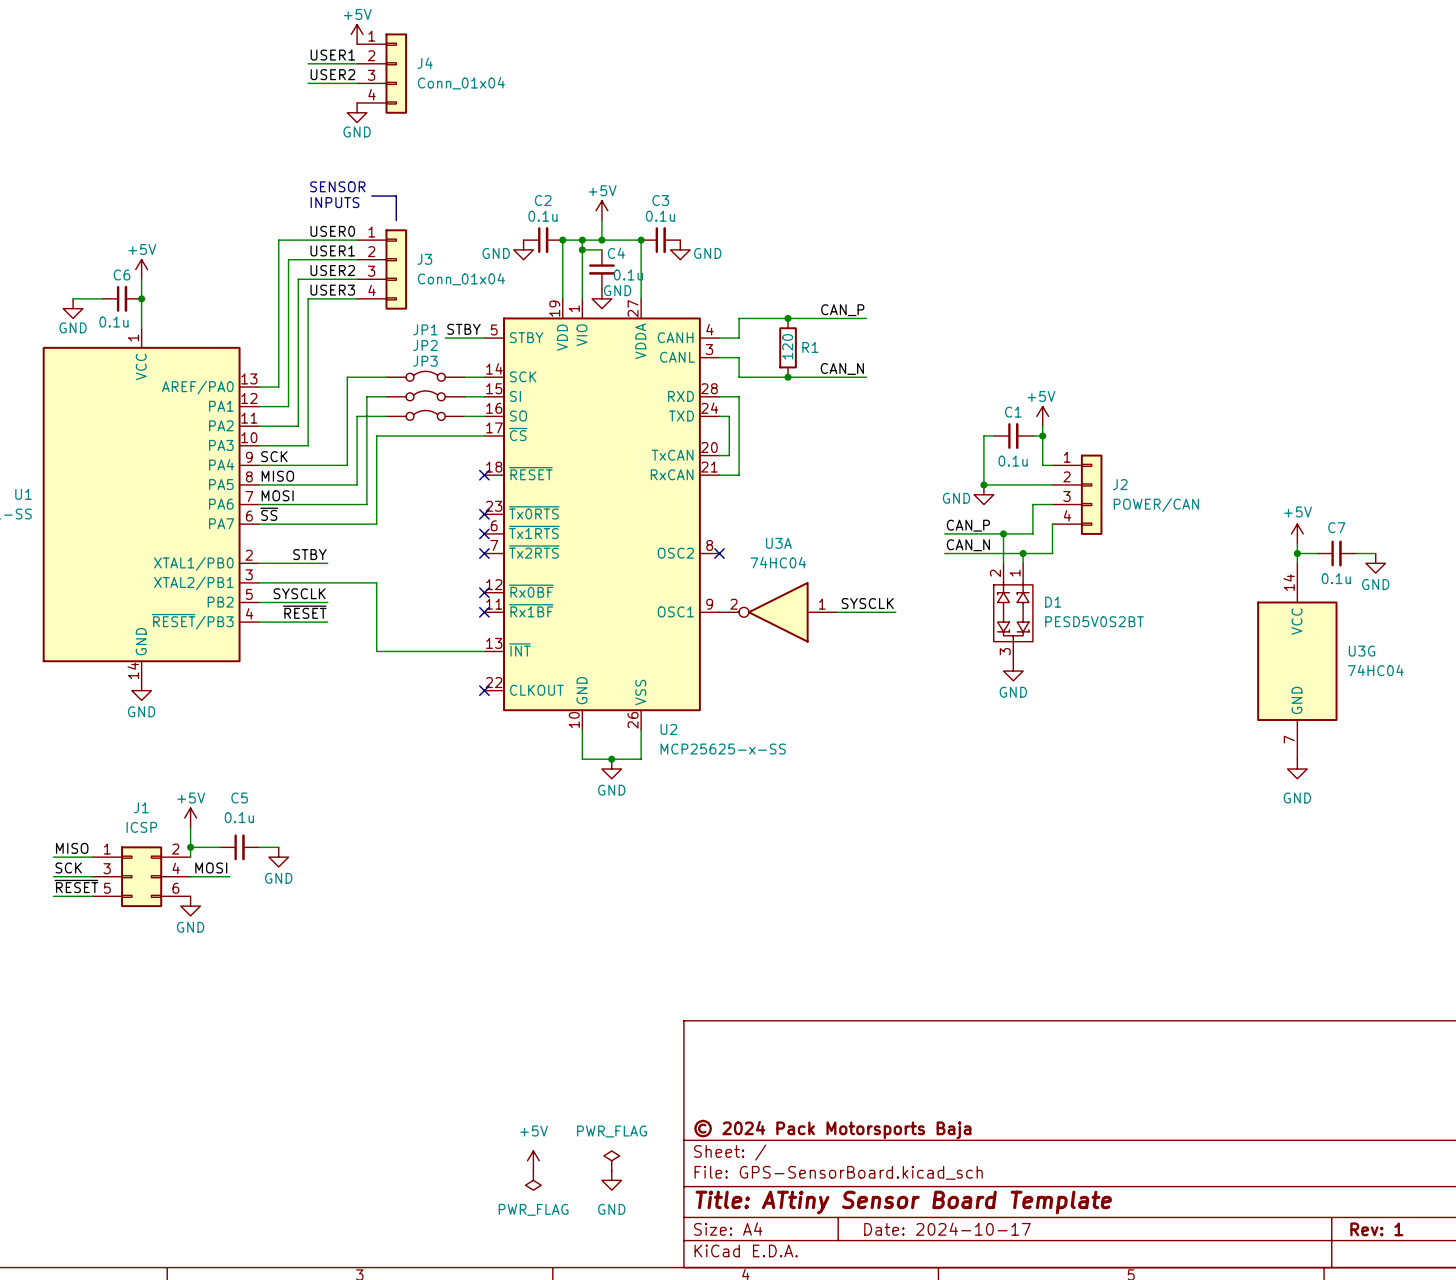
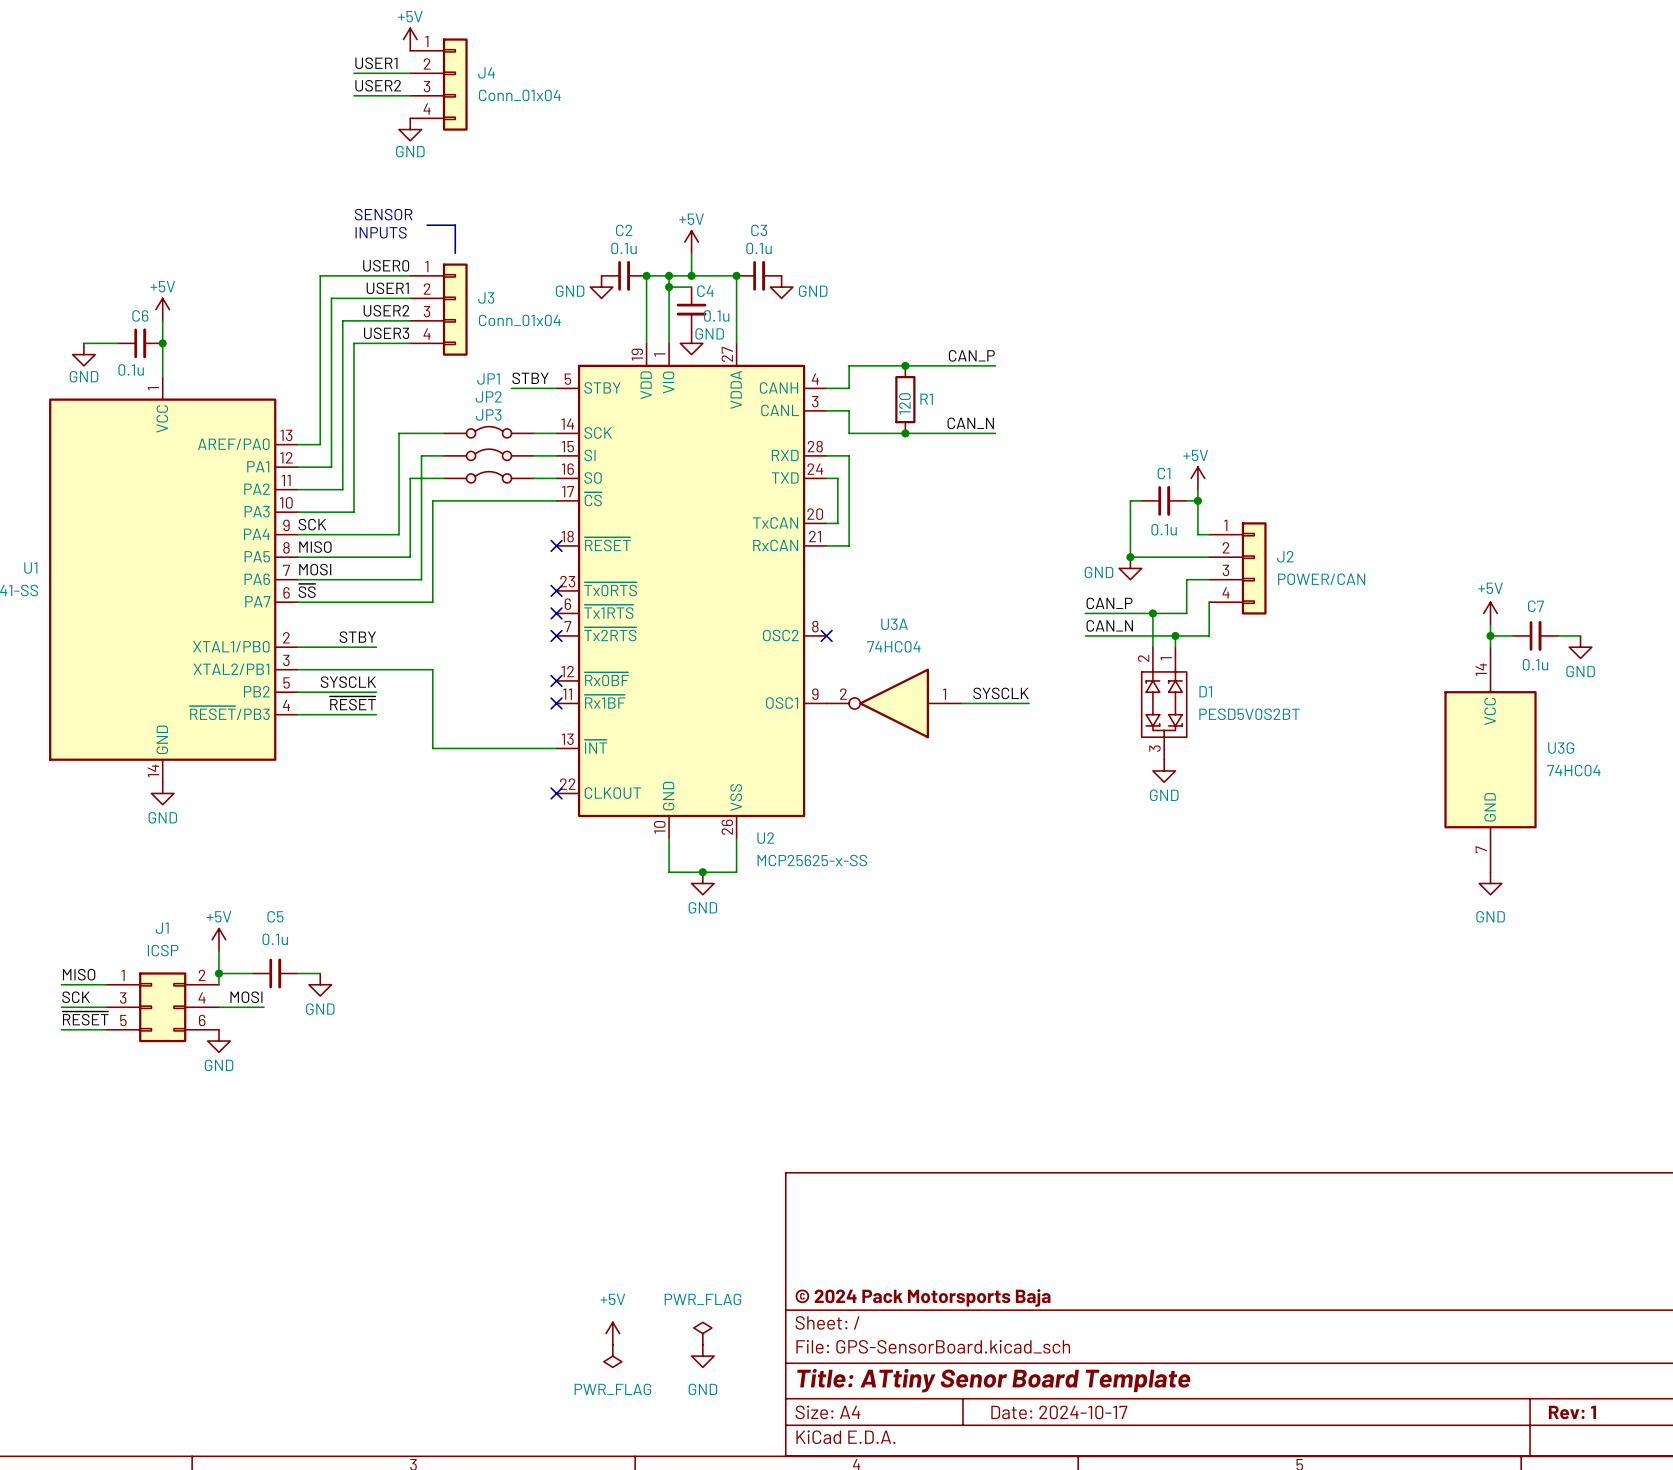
title block: Title: ATtiny Sensor Board Template (903, 1202) -> Title: ATtiny Senor Board Template (993, 1380)

